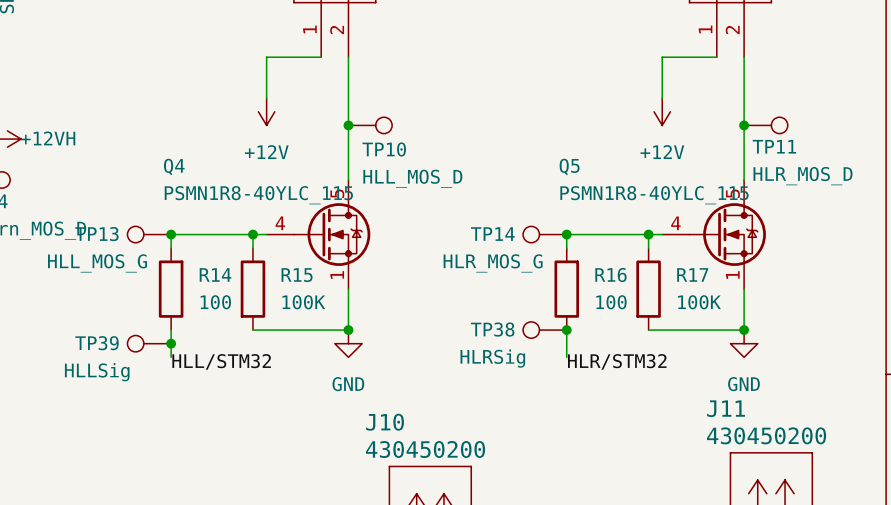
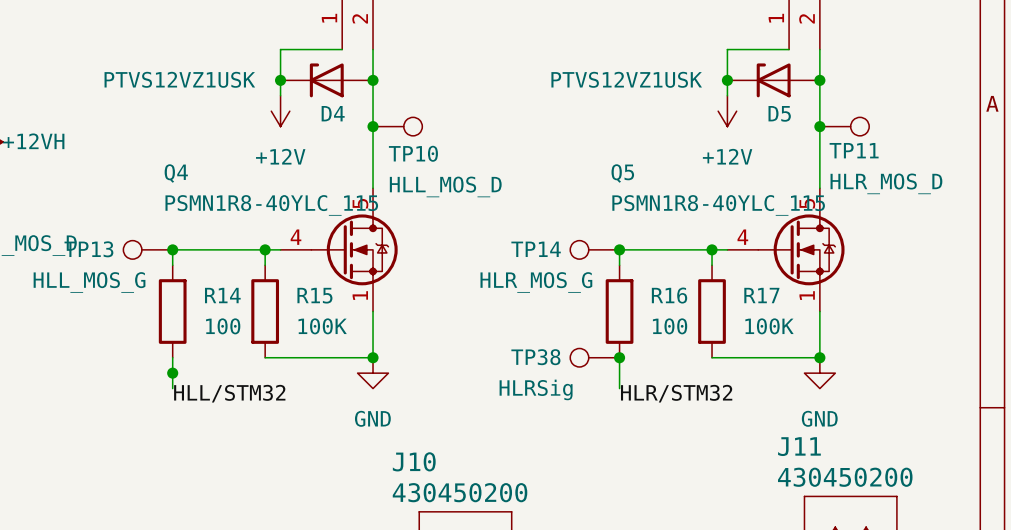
junction: none -> (280, 80)
D4: none -> PTVS12VZ1USK (326, 80)
junction: none -> (373, 80)
junction: none -> (727, 80)
D5: none -> PTVS12VZ1USK (773, 80)
junction: none -> (819, 80)
TP39: HLLSig (149, 343) -> none

